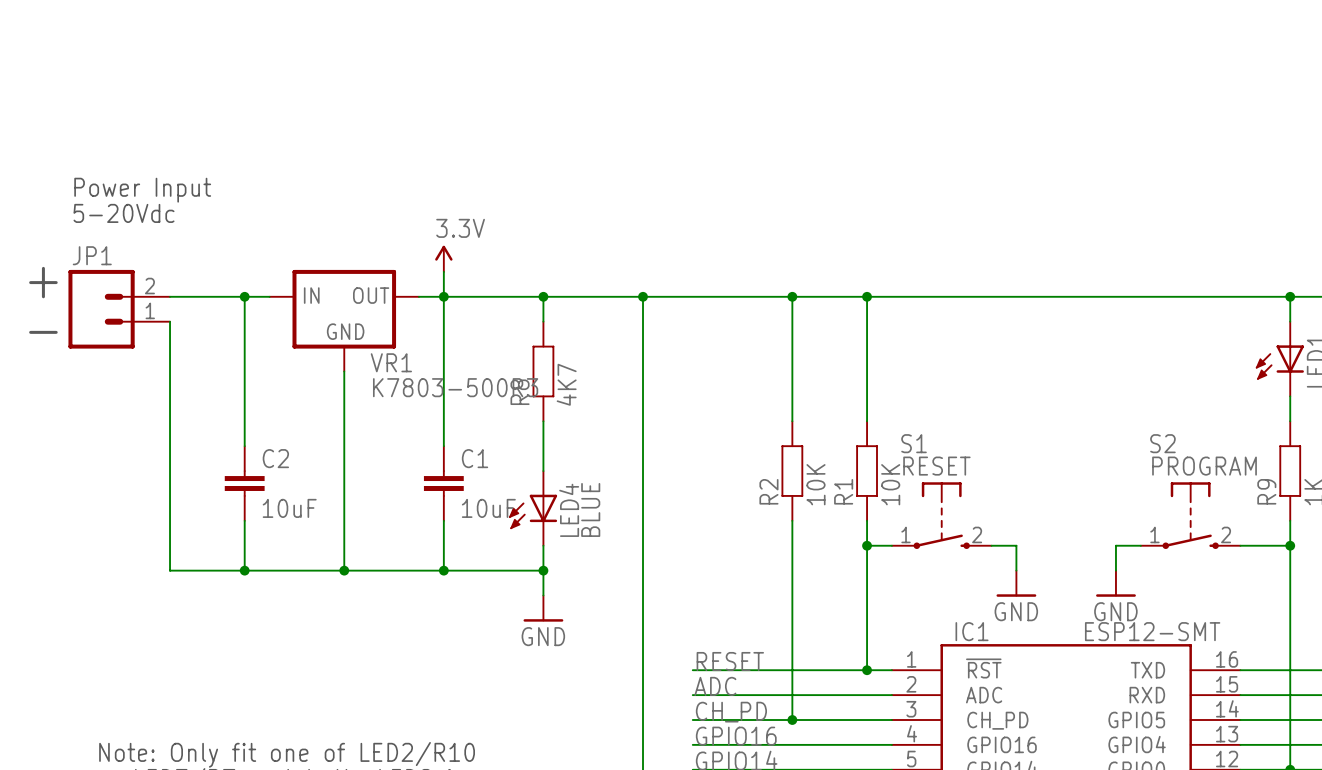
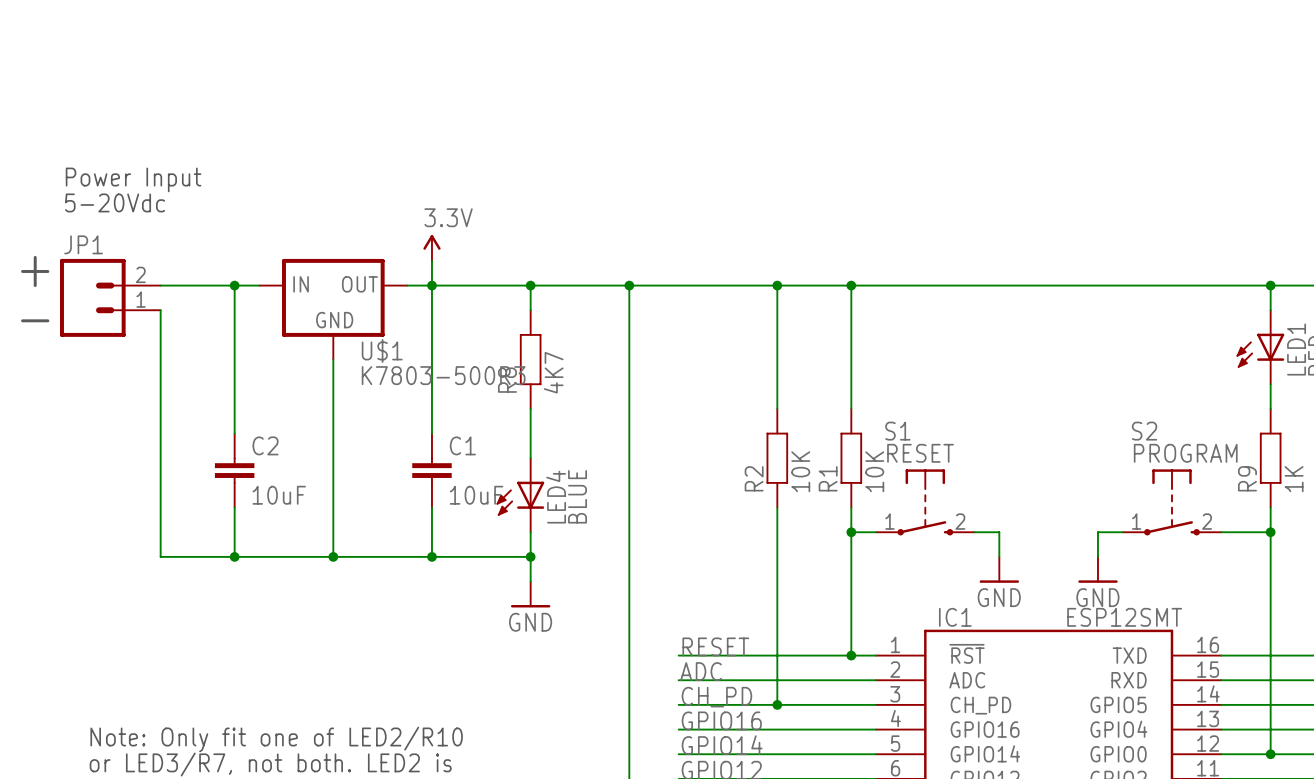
VR1 name: VR1 (391, 362) -> U$1 (382, 350)
IC1 value: ESP12-SMT (1152, 631) -> ESP12SMT (1124, 617)

